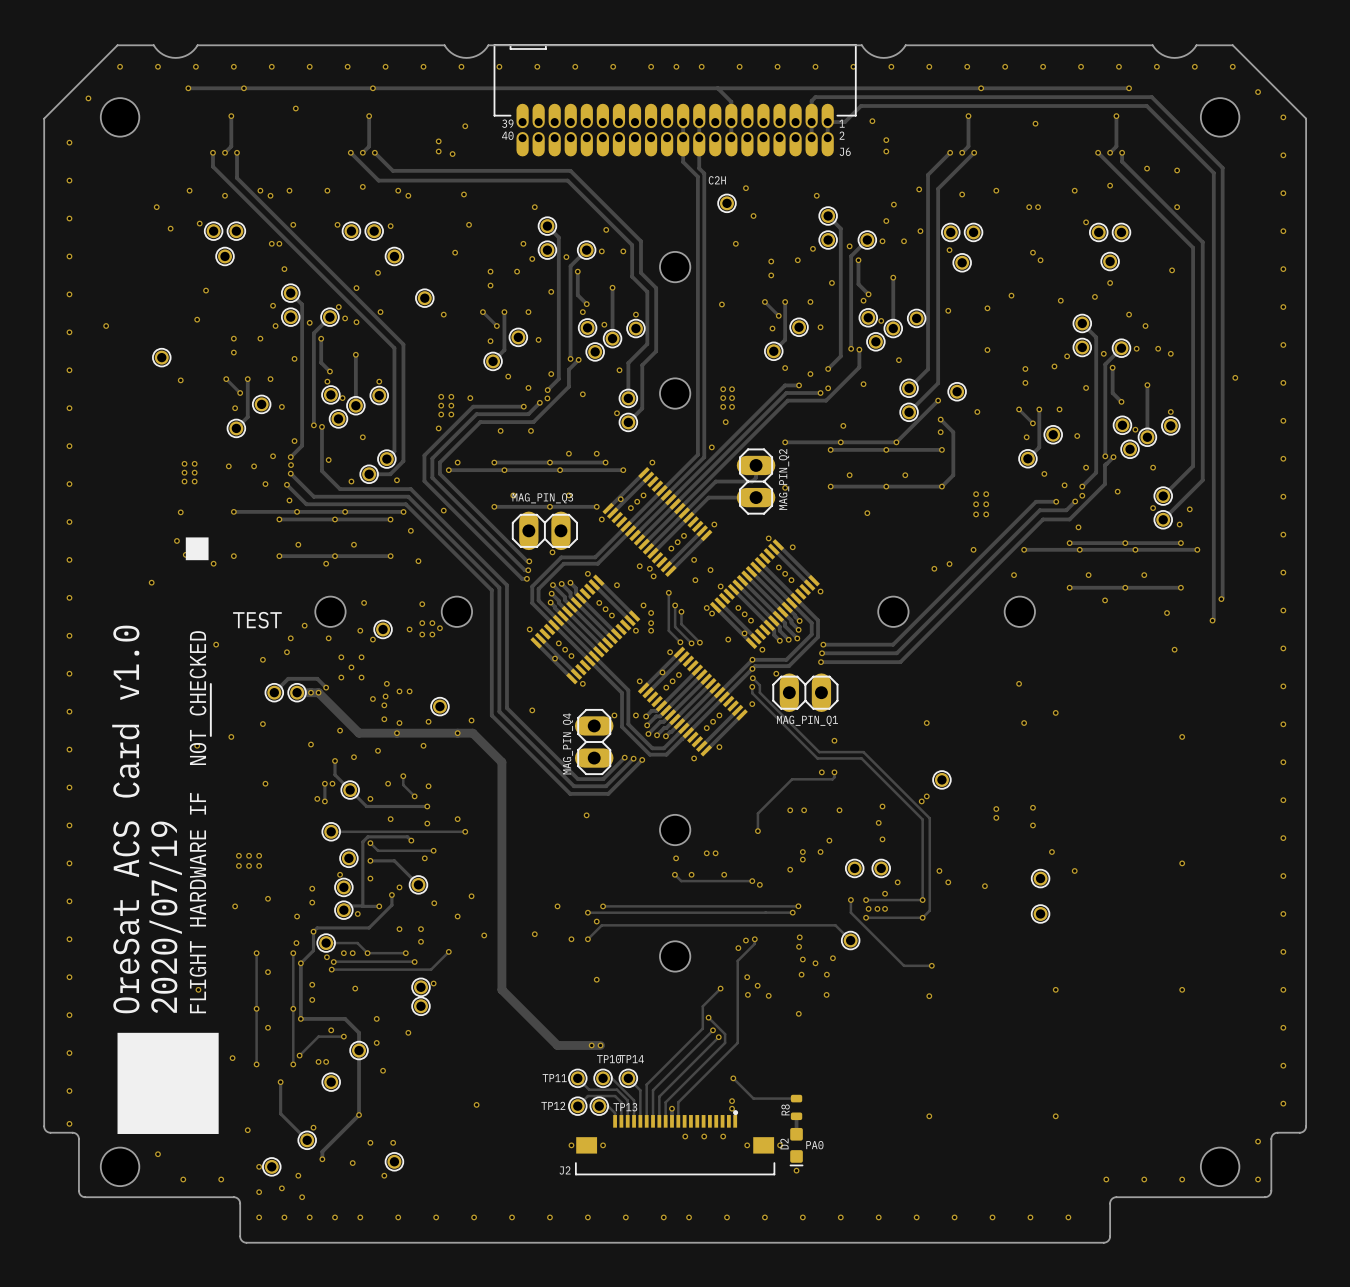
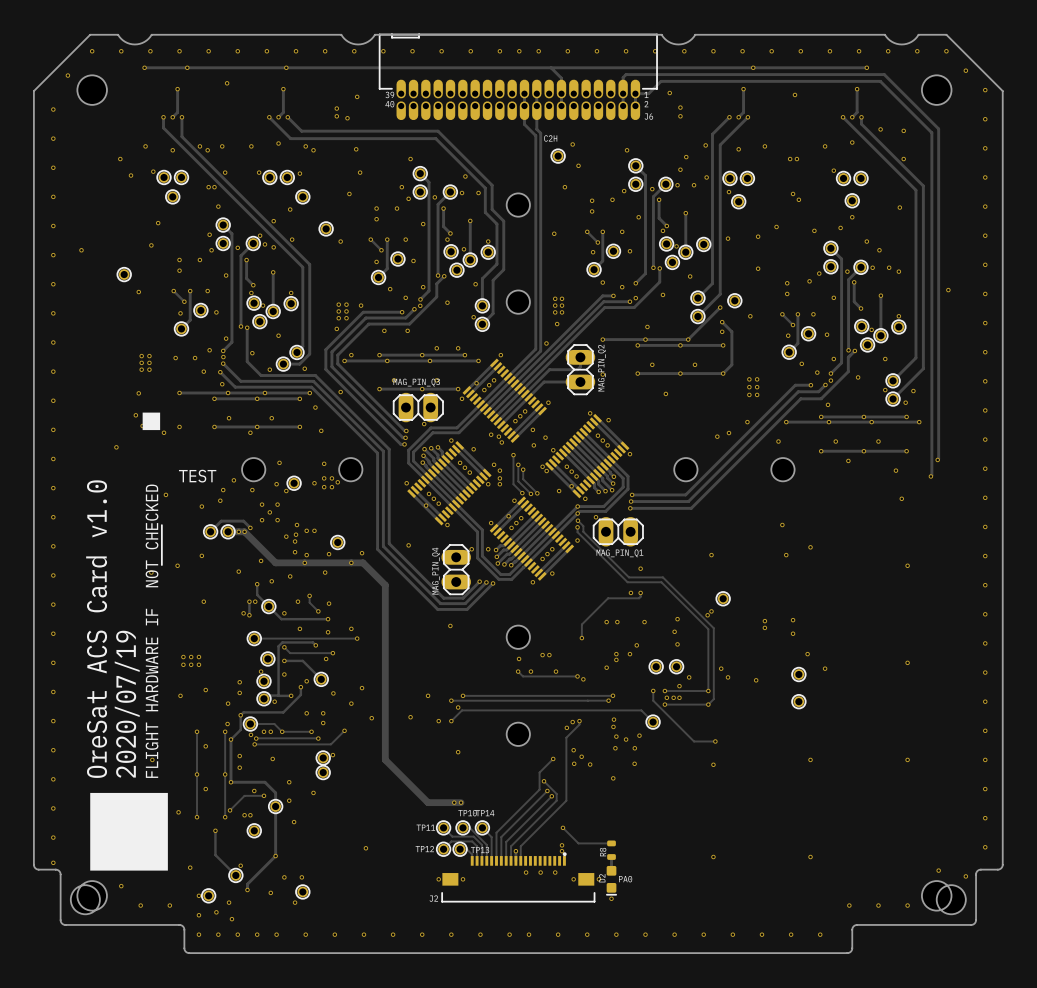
drawing: [44, 45, 1307, 1243] -> none
part: none -> (518, 493)
via position: (1258, 1179) -> (938, 870)

